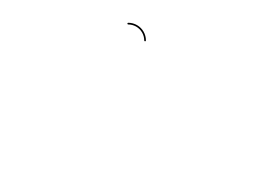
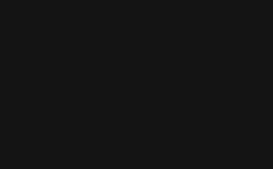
board edge: (128, 23) (140, 28) (145, 40) -> none

